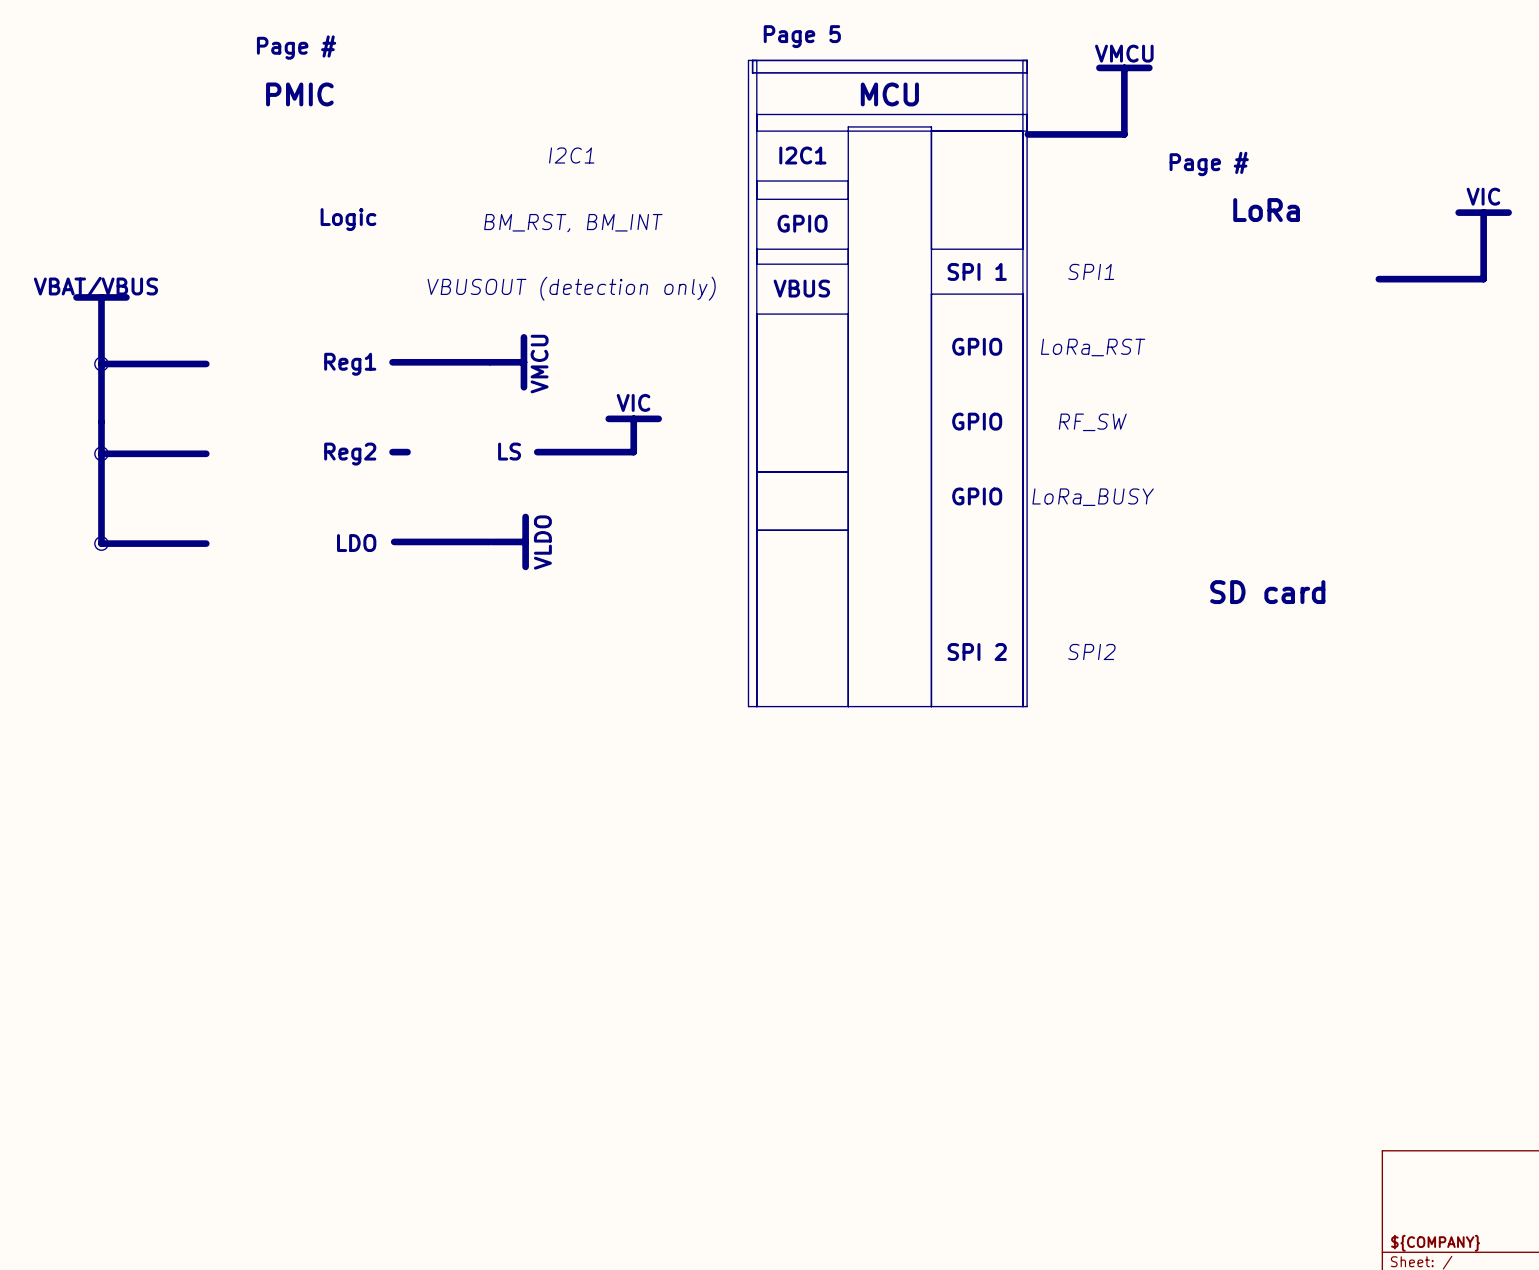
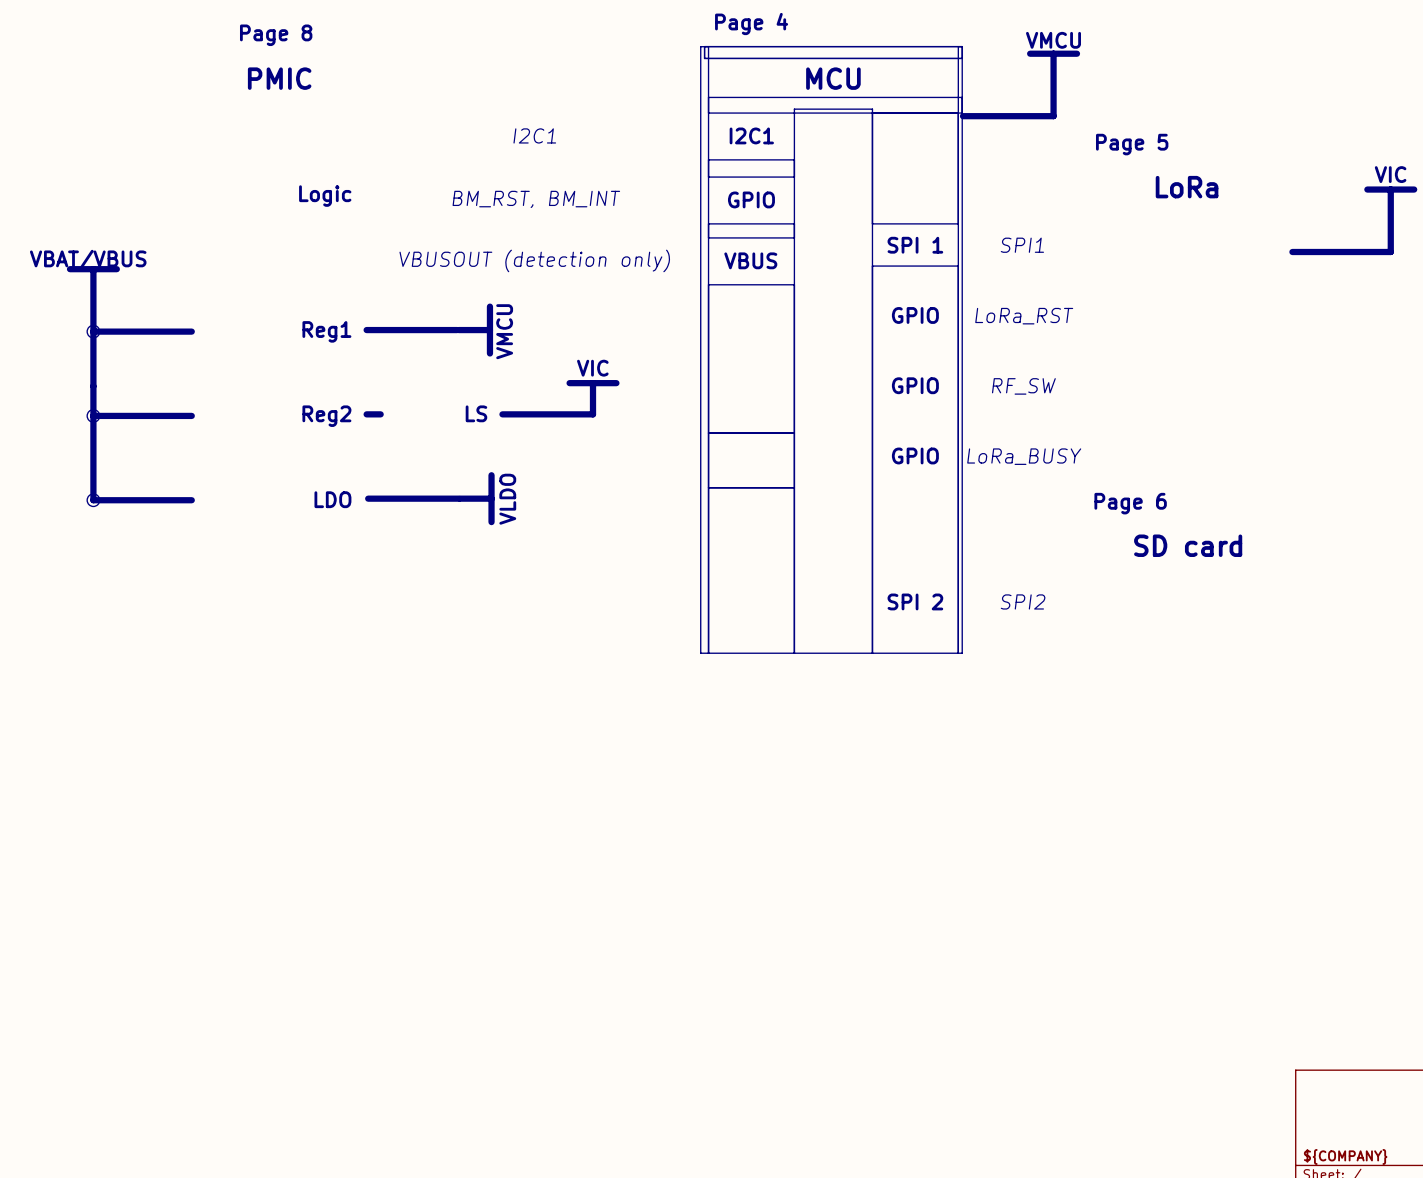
text: Page 5 (802, 36) -> Page 4 (751, 24)
text: Page # (296, 47) -> Page 8 (276, 35)
text: Page # (1209, 163) -> Page 5 (1132, 144)
text: none -> Page 6 (1130, 503)

